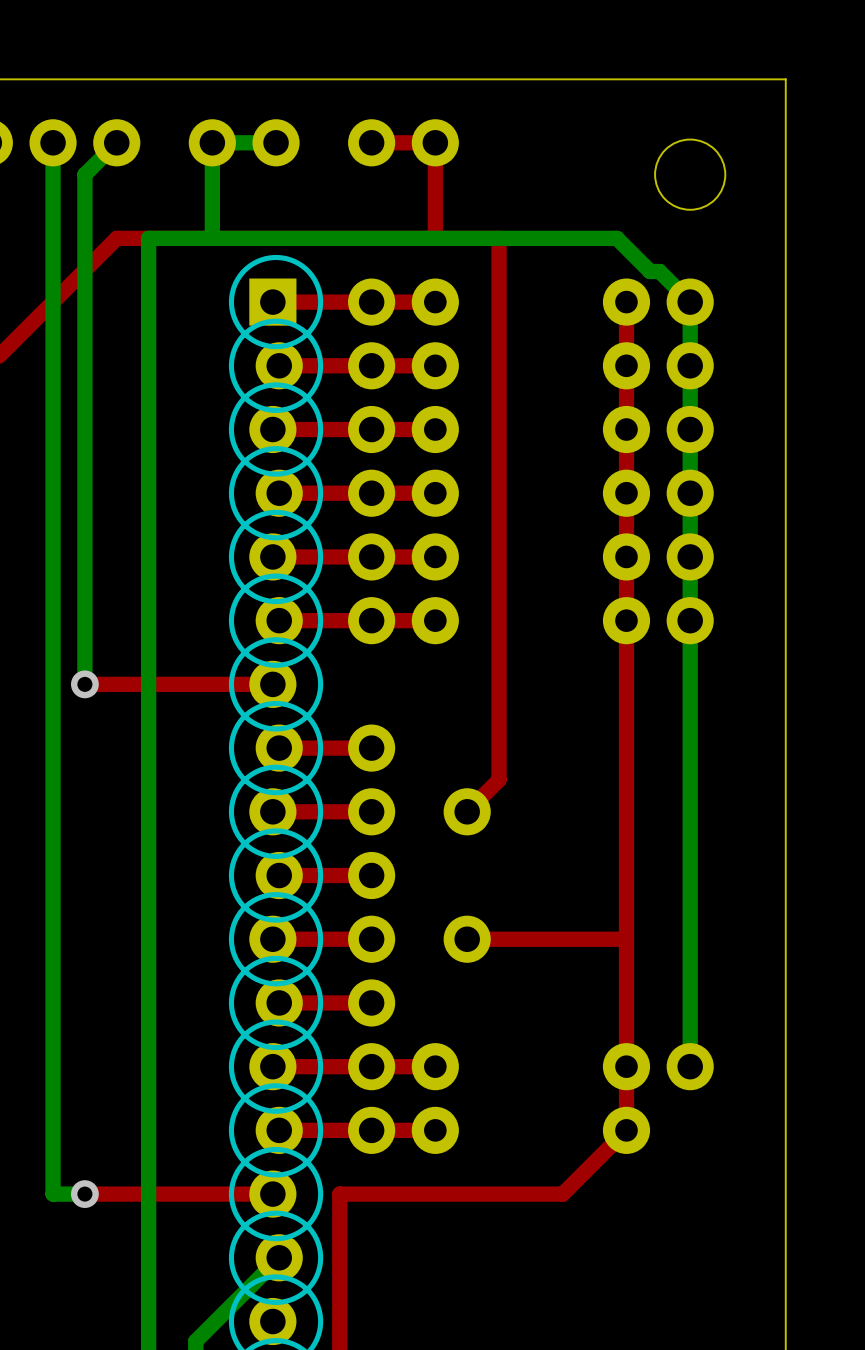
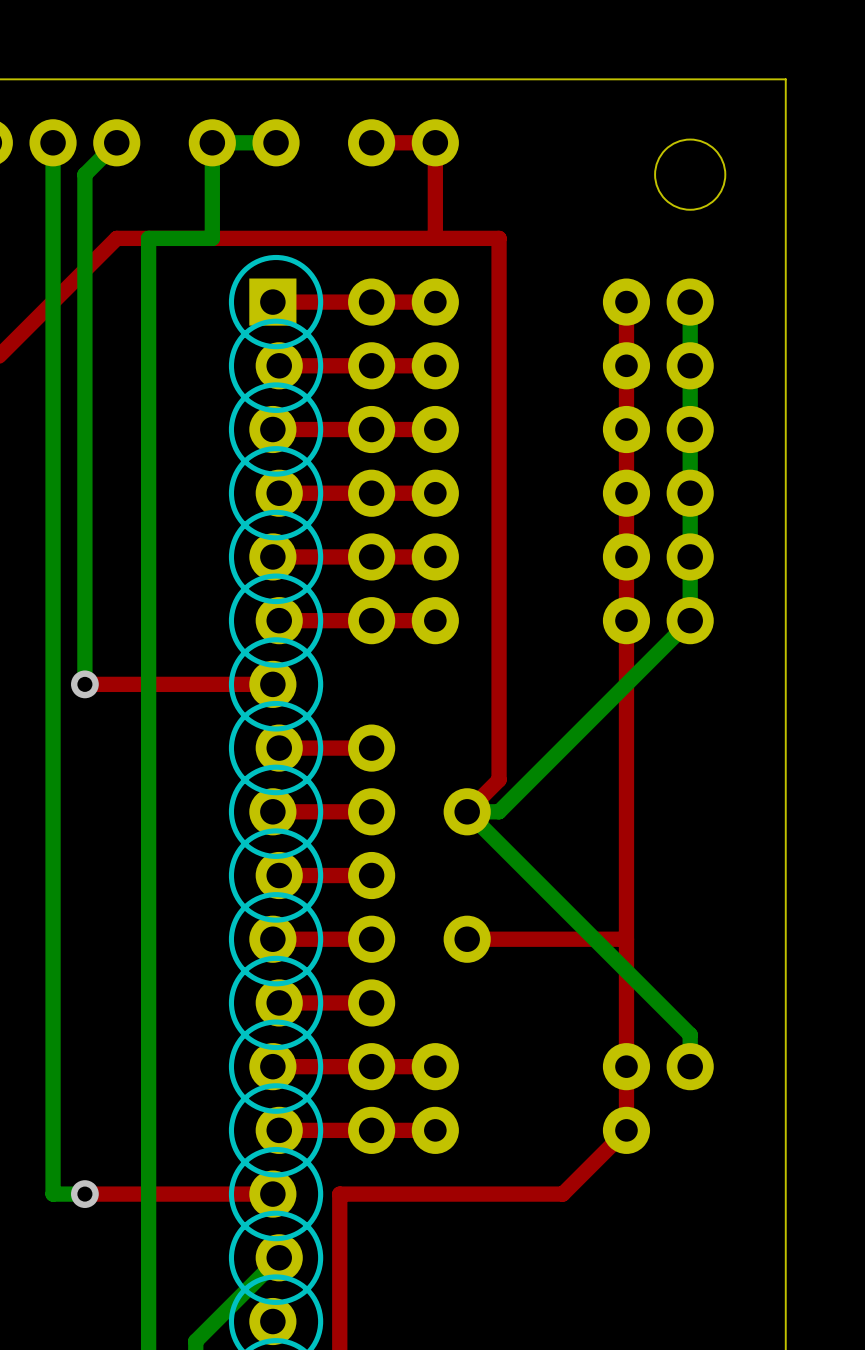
bottom track: (212, 238) (616, 238) (650, 271) (659, 271) (690, 302) -> none
bottom track: (690, 620) (690, 1034) -> (690, 620) (499, 811) (467, 811) (690, 1034)

